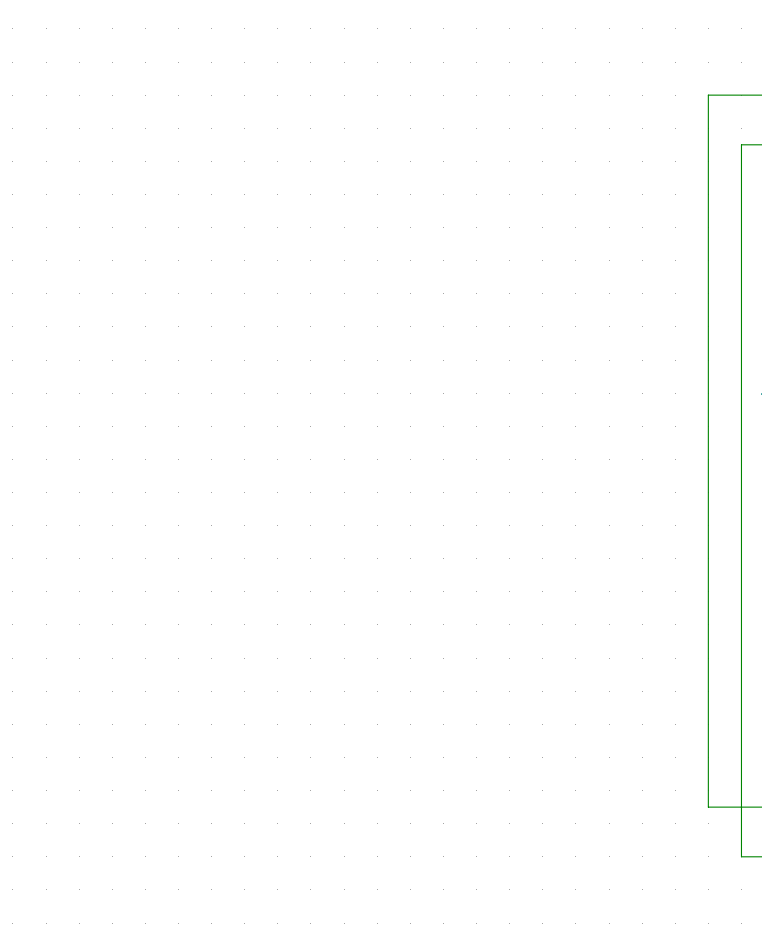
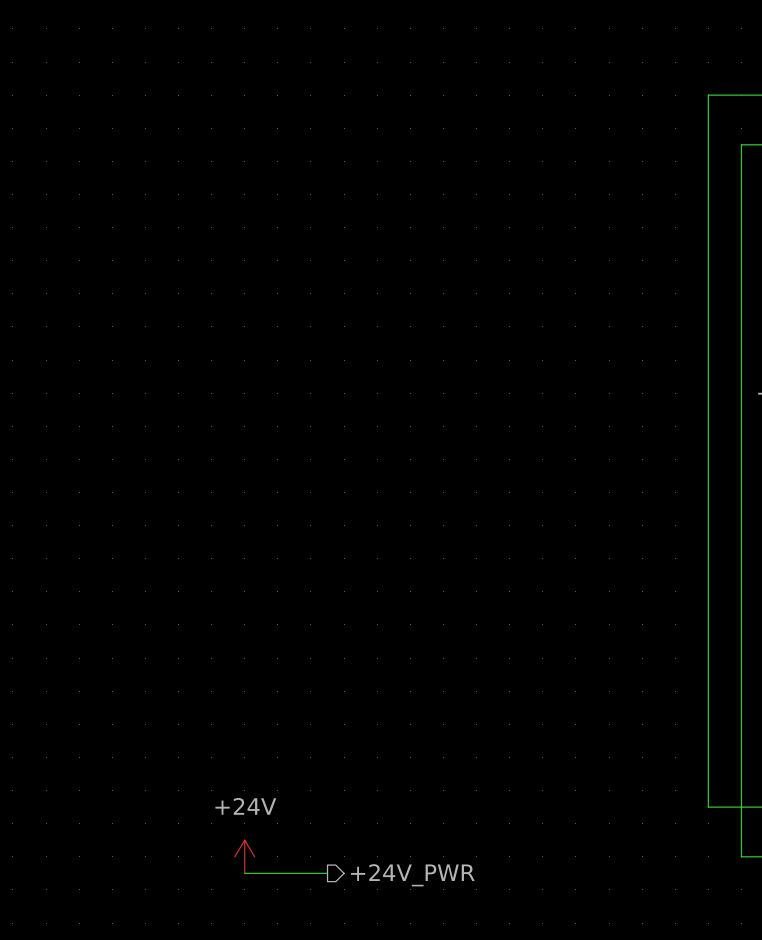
power symbol: none -> +24V (244, 856)
wire: none -> (244, 873) (327, 873)
sheet pin: none -> +24V_PWR (412, 875)

